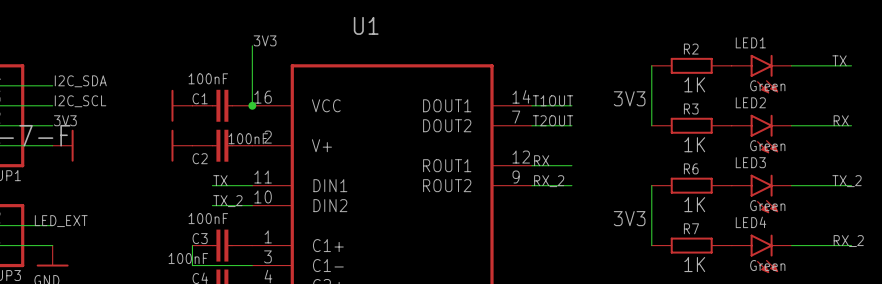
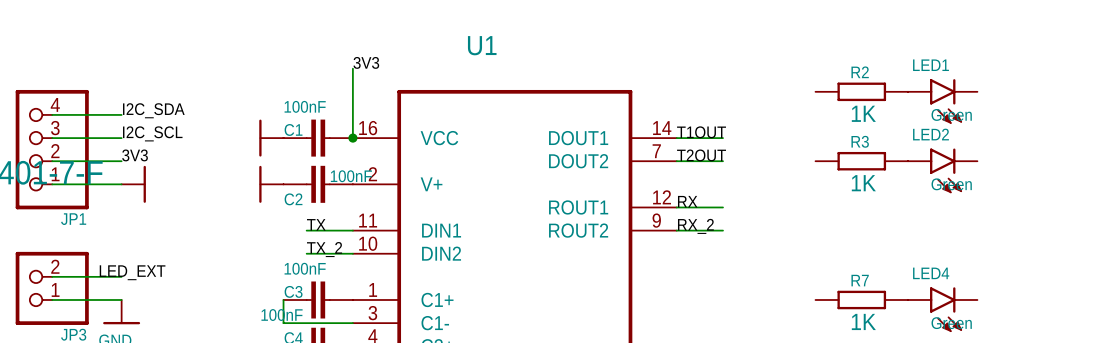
label: TX (839, 60) -> none
wire: (651, 65) (651, 125) -> none
wire: (791, 65) (851, 65) -> none
label: 3V3 (629, 98) -> none
label: RX (841, 120) -> none
wire: (791, 125) (851, 125) -> none
label: TX_2 (847, 181) -> none
wire: (651, 185) (651, 245) -> none
R6: 1K (691, 185) -> none
wire: (791, 185) (851, 185) -> none
LED3: Green (761, 193) -> none
label: 3V3 (629, 218) -> none
label: RX_2 (848, 241) -> none
wire: (791, 245) (851, 245) -> none

